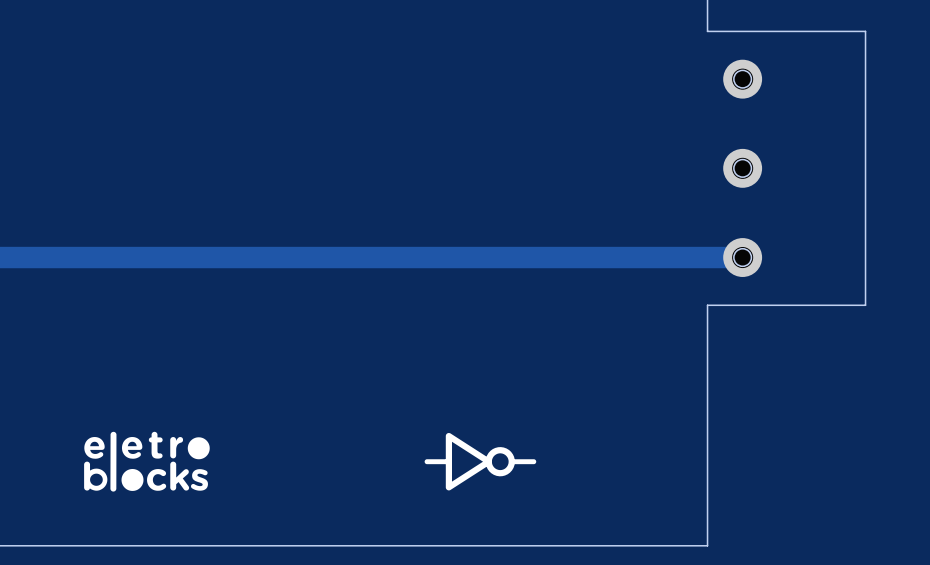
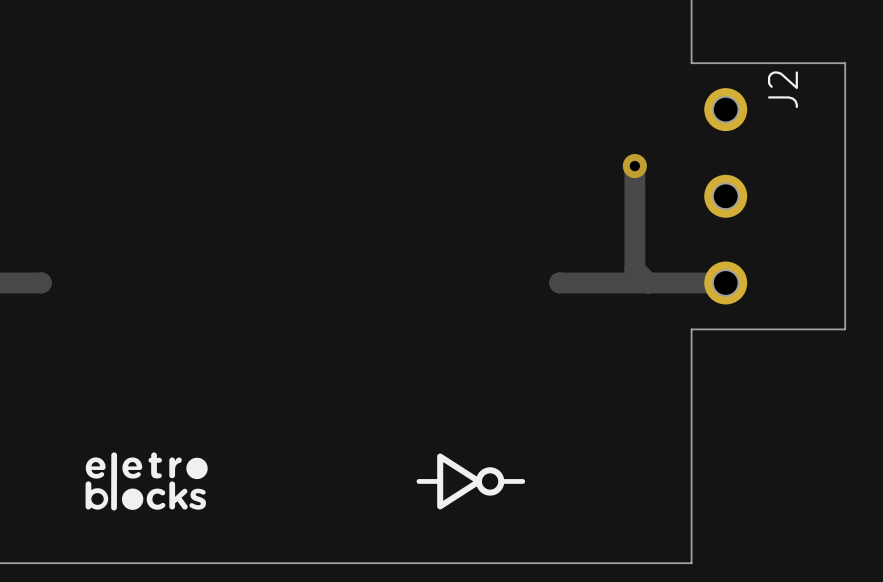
track: none -> (634, 166) (634, 269) (648, 282)
via: none -> (634, 166)
part: (742, 168) -> none
J2: none -> (725, 196)
track: (38, 257) (571, 257) -> none

